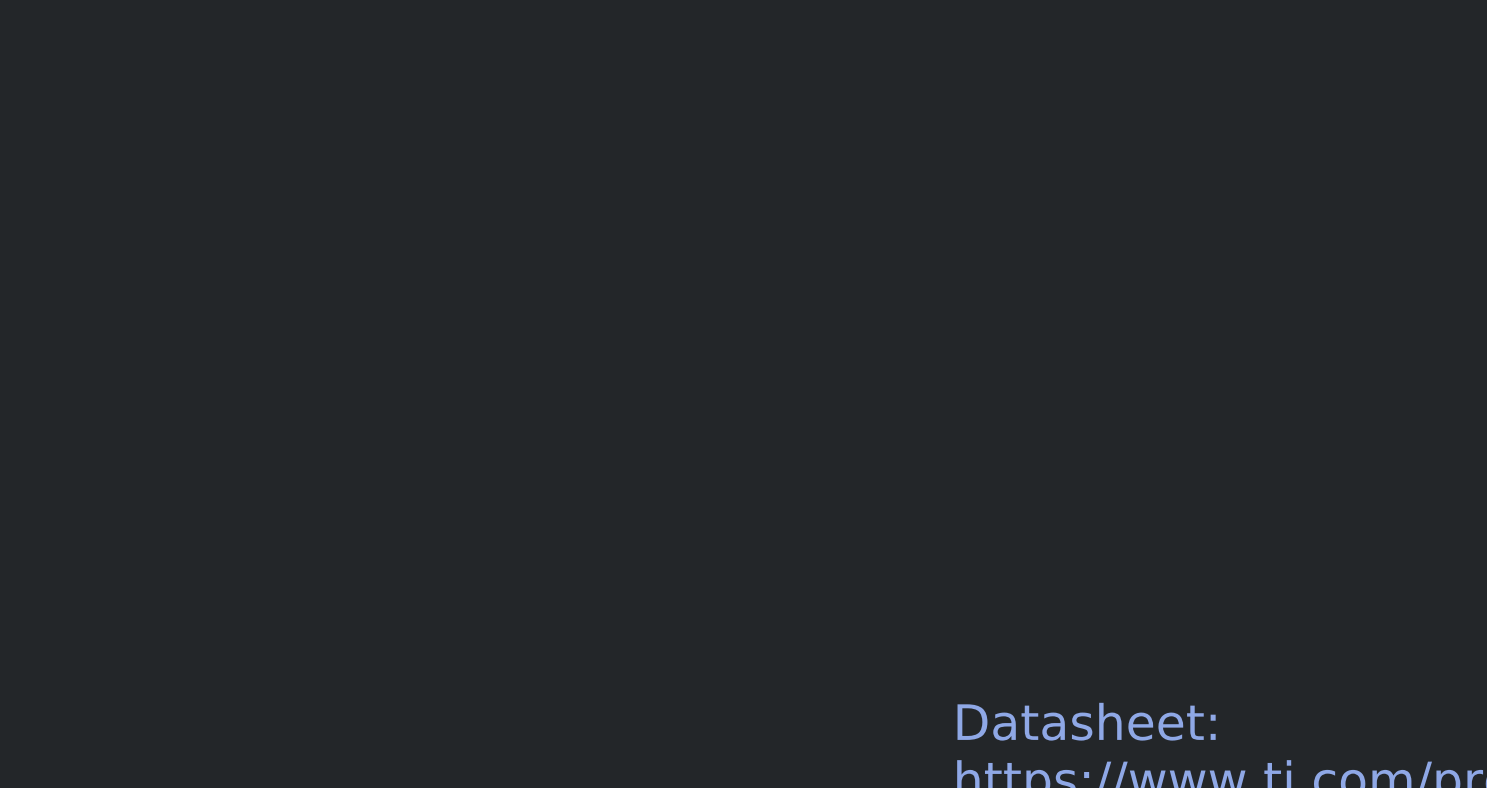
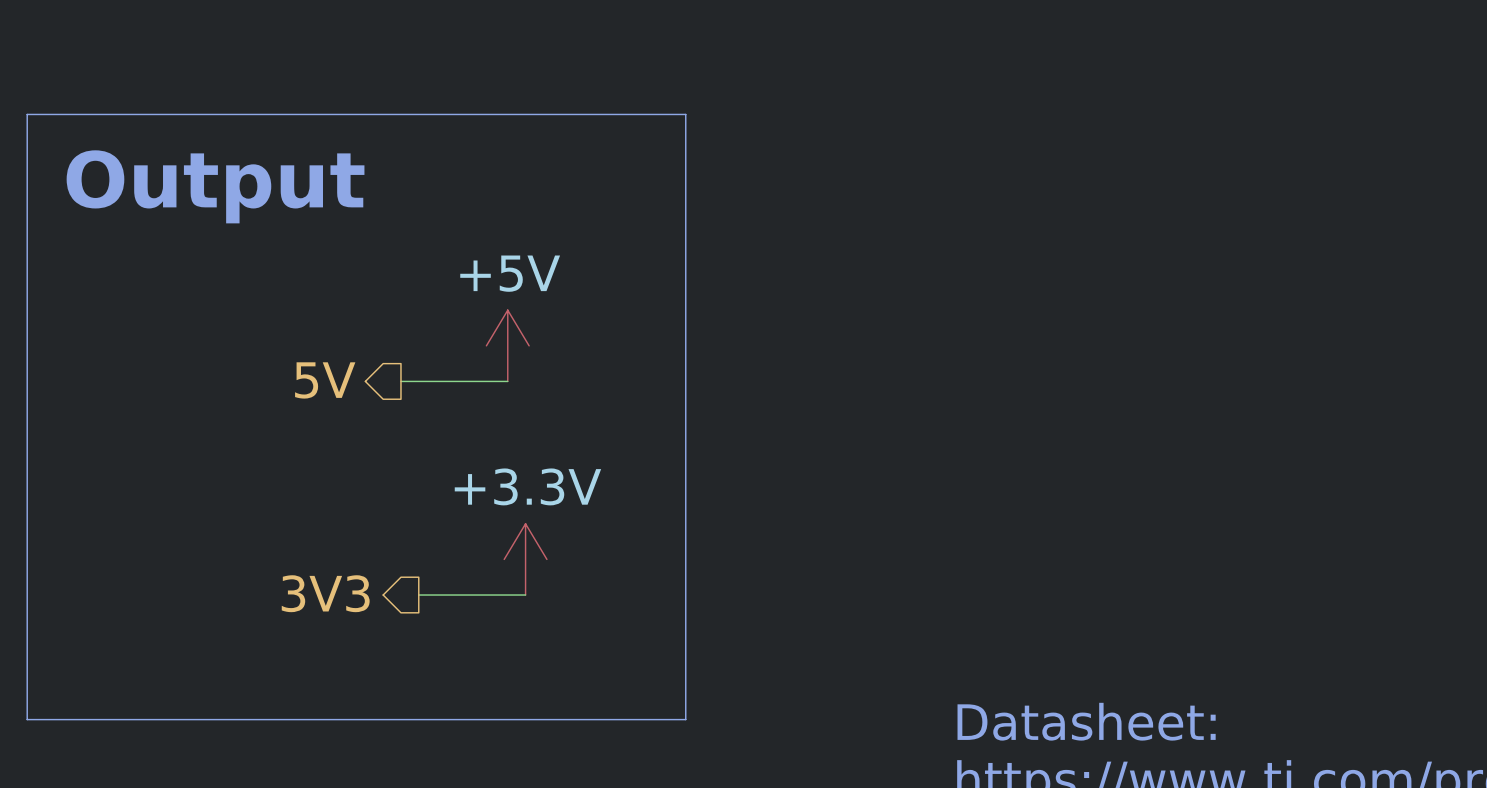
line: none -> (27, 114) (685, 114) (685, 719) (27, 719) (27, 114)
text: none -> Output (215, 186)
power symbol: none -> +5V (507, 345)
hierarchical label: none -> 5V (325, 380)
wire: none -> (400, 381) (507, 381)
power symbol: none -> +3.3V (525, 559)
hierarchical label: none -> 3V3 (325, 593)
wire: none -> (418, 595) (525, 595)

